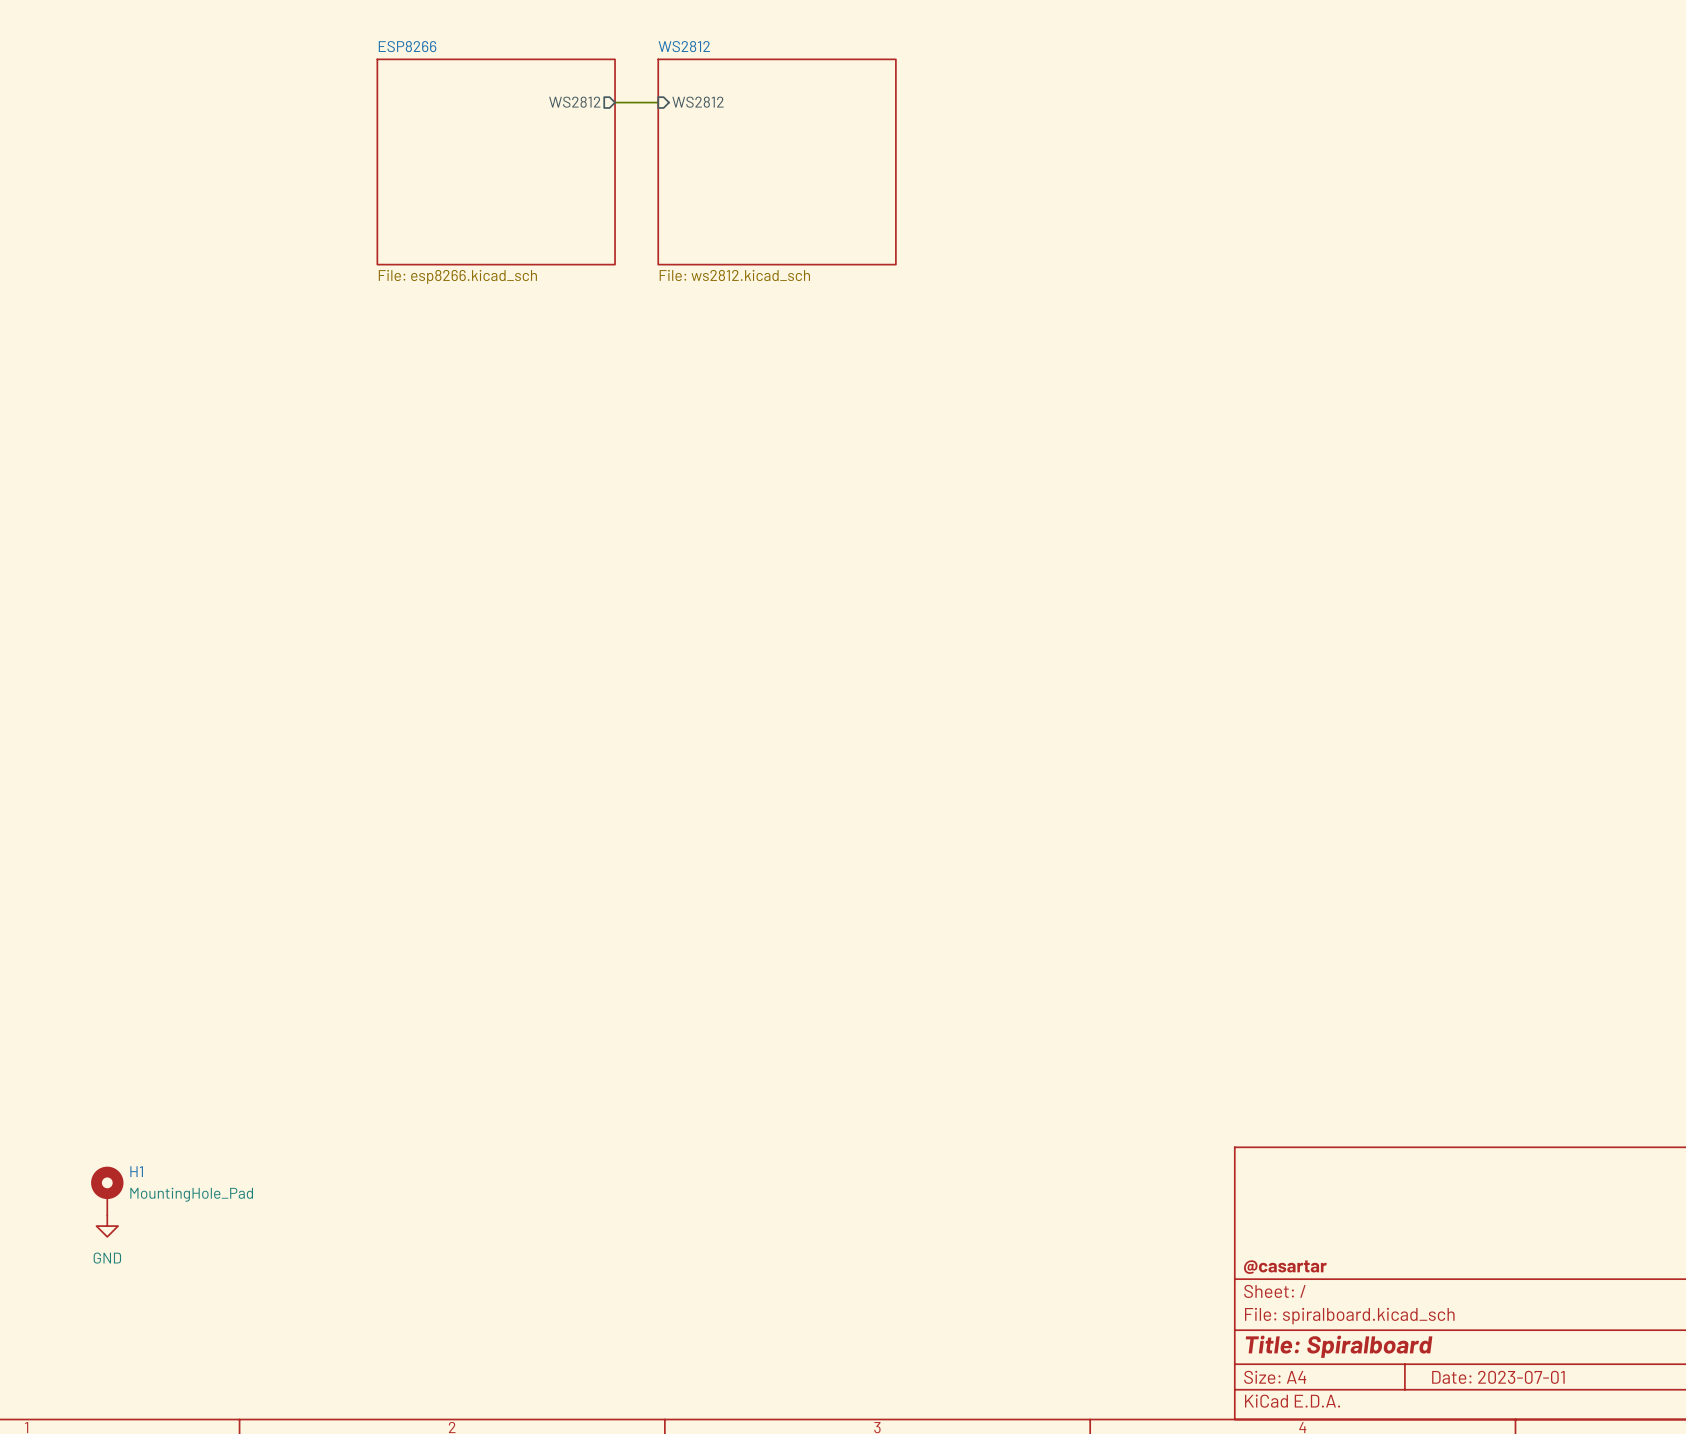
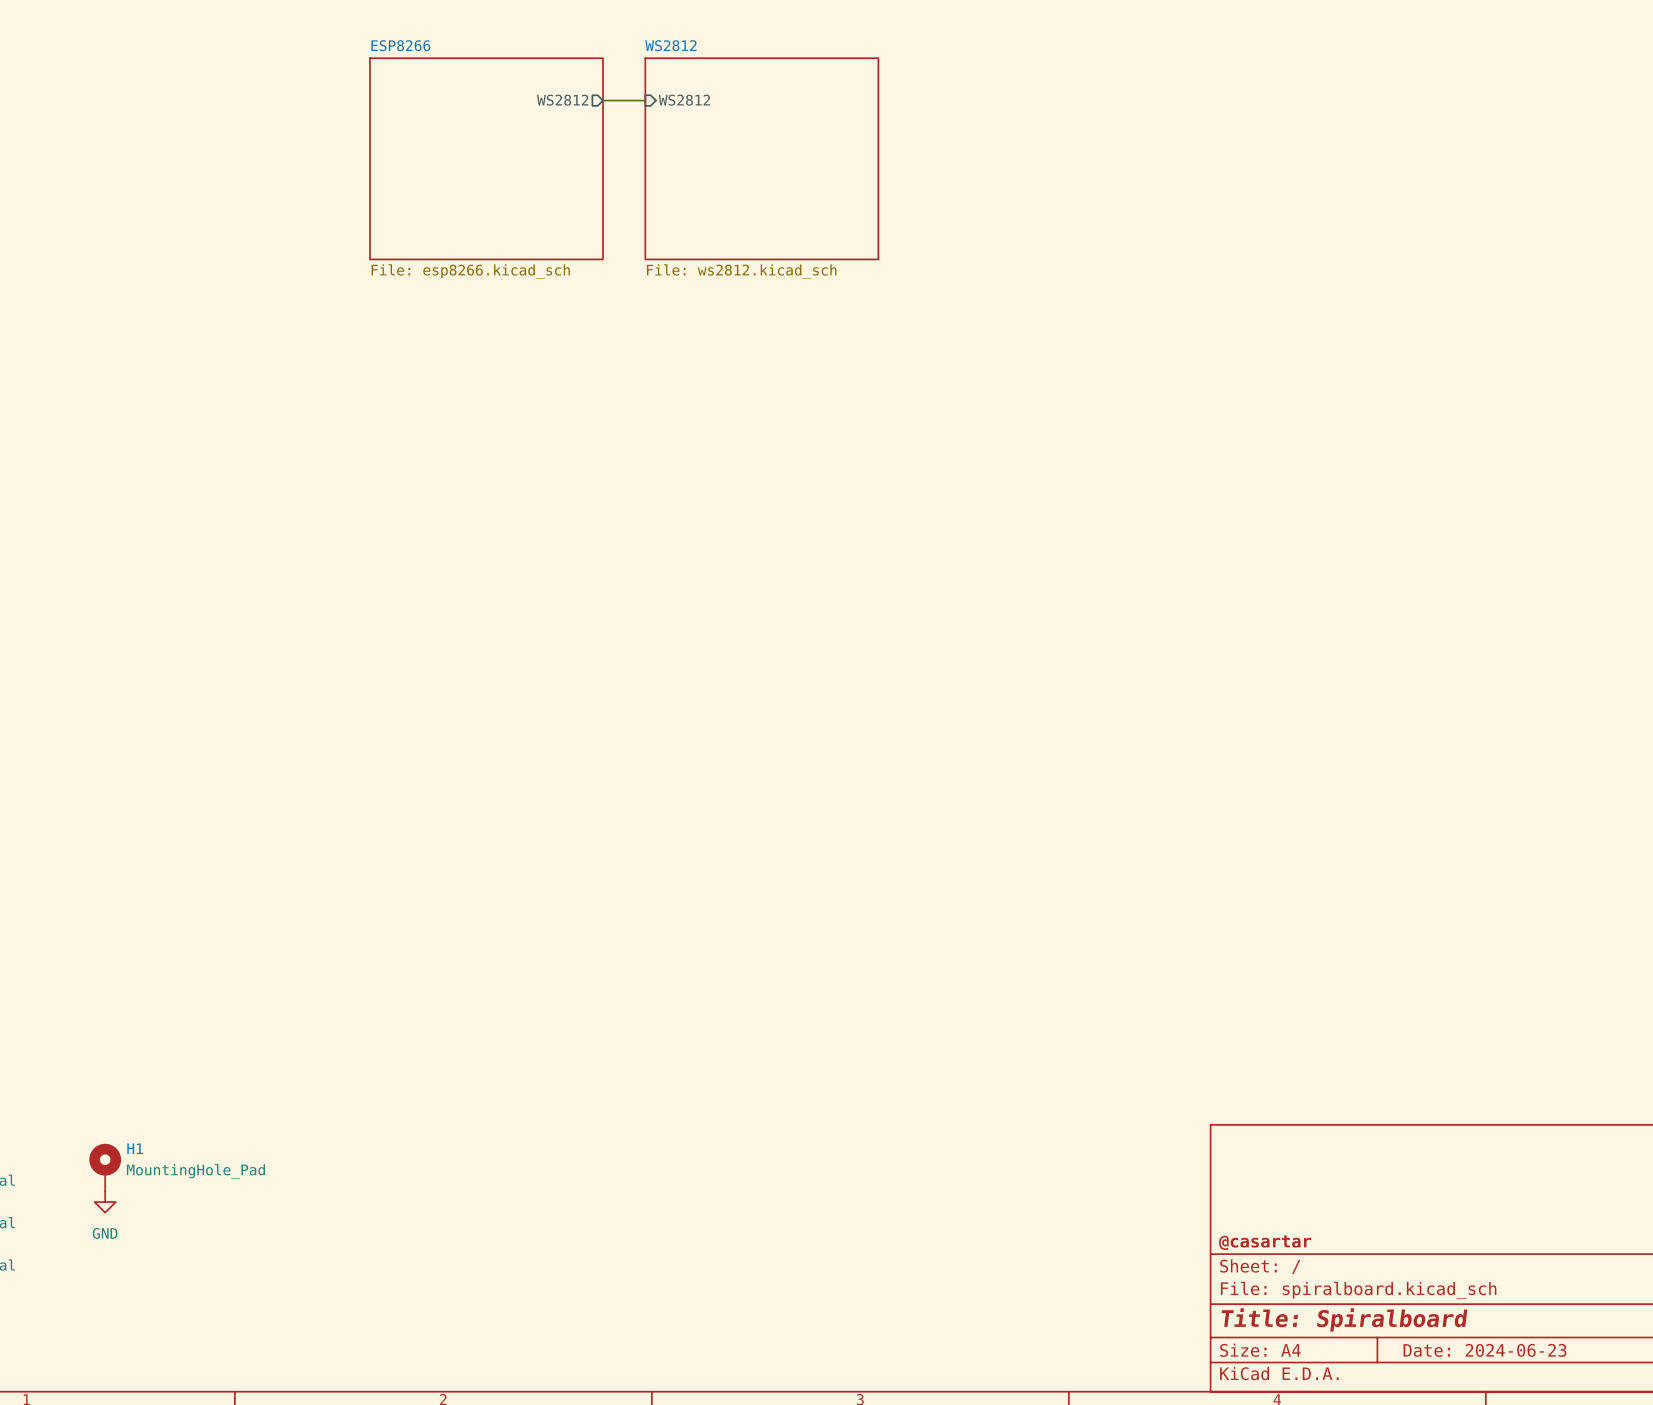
title block: Date: 2023-07-01 (1498, 1377) -> Date: 2024-06-23 (1484, 1350)

